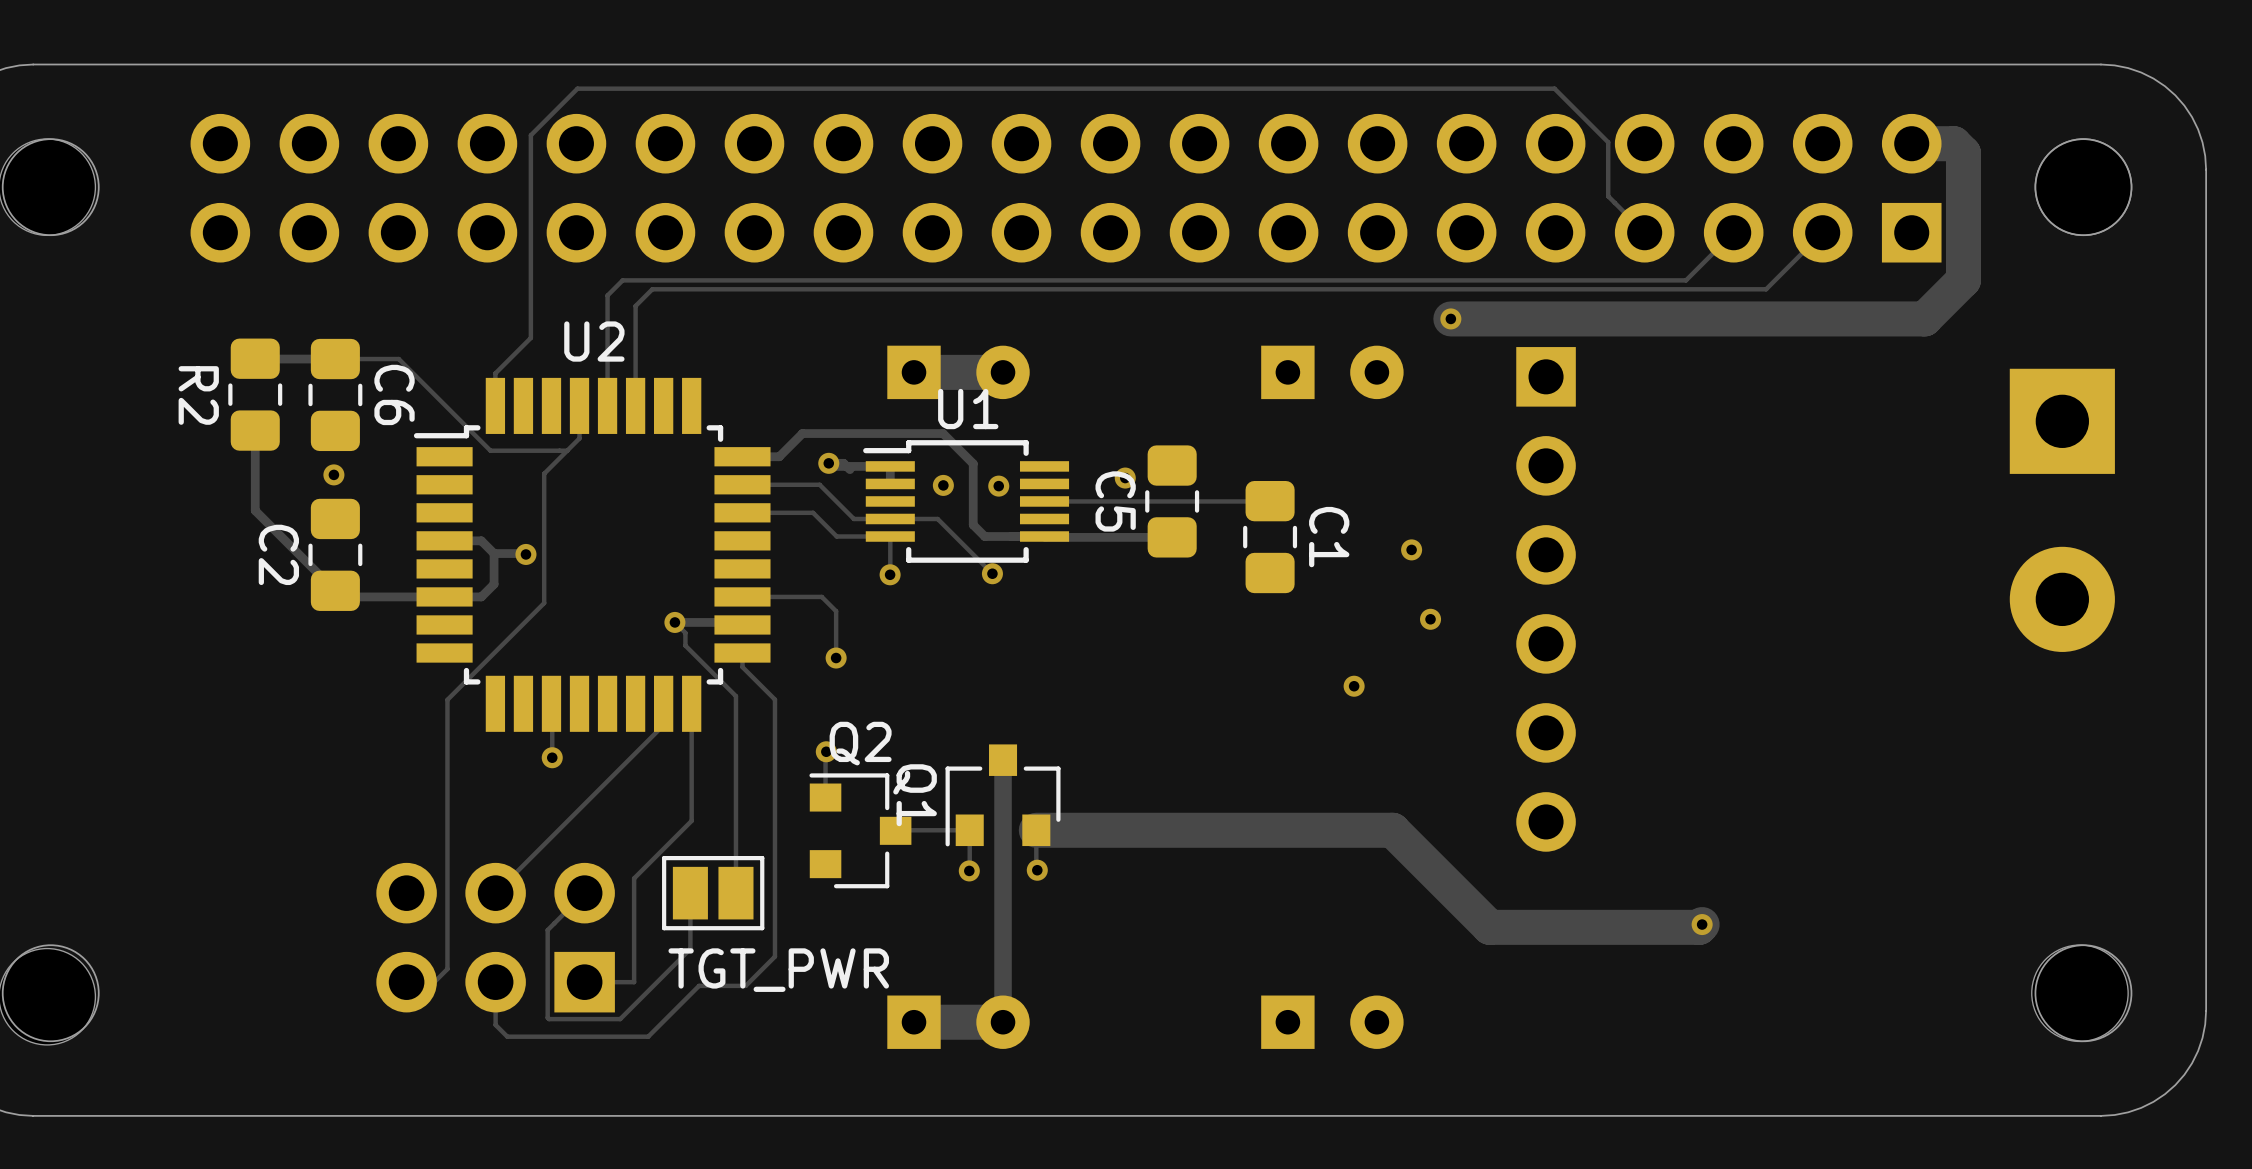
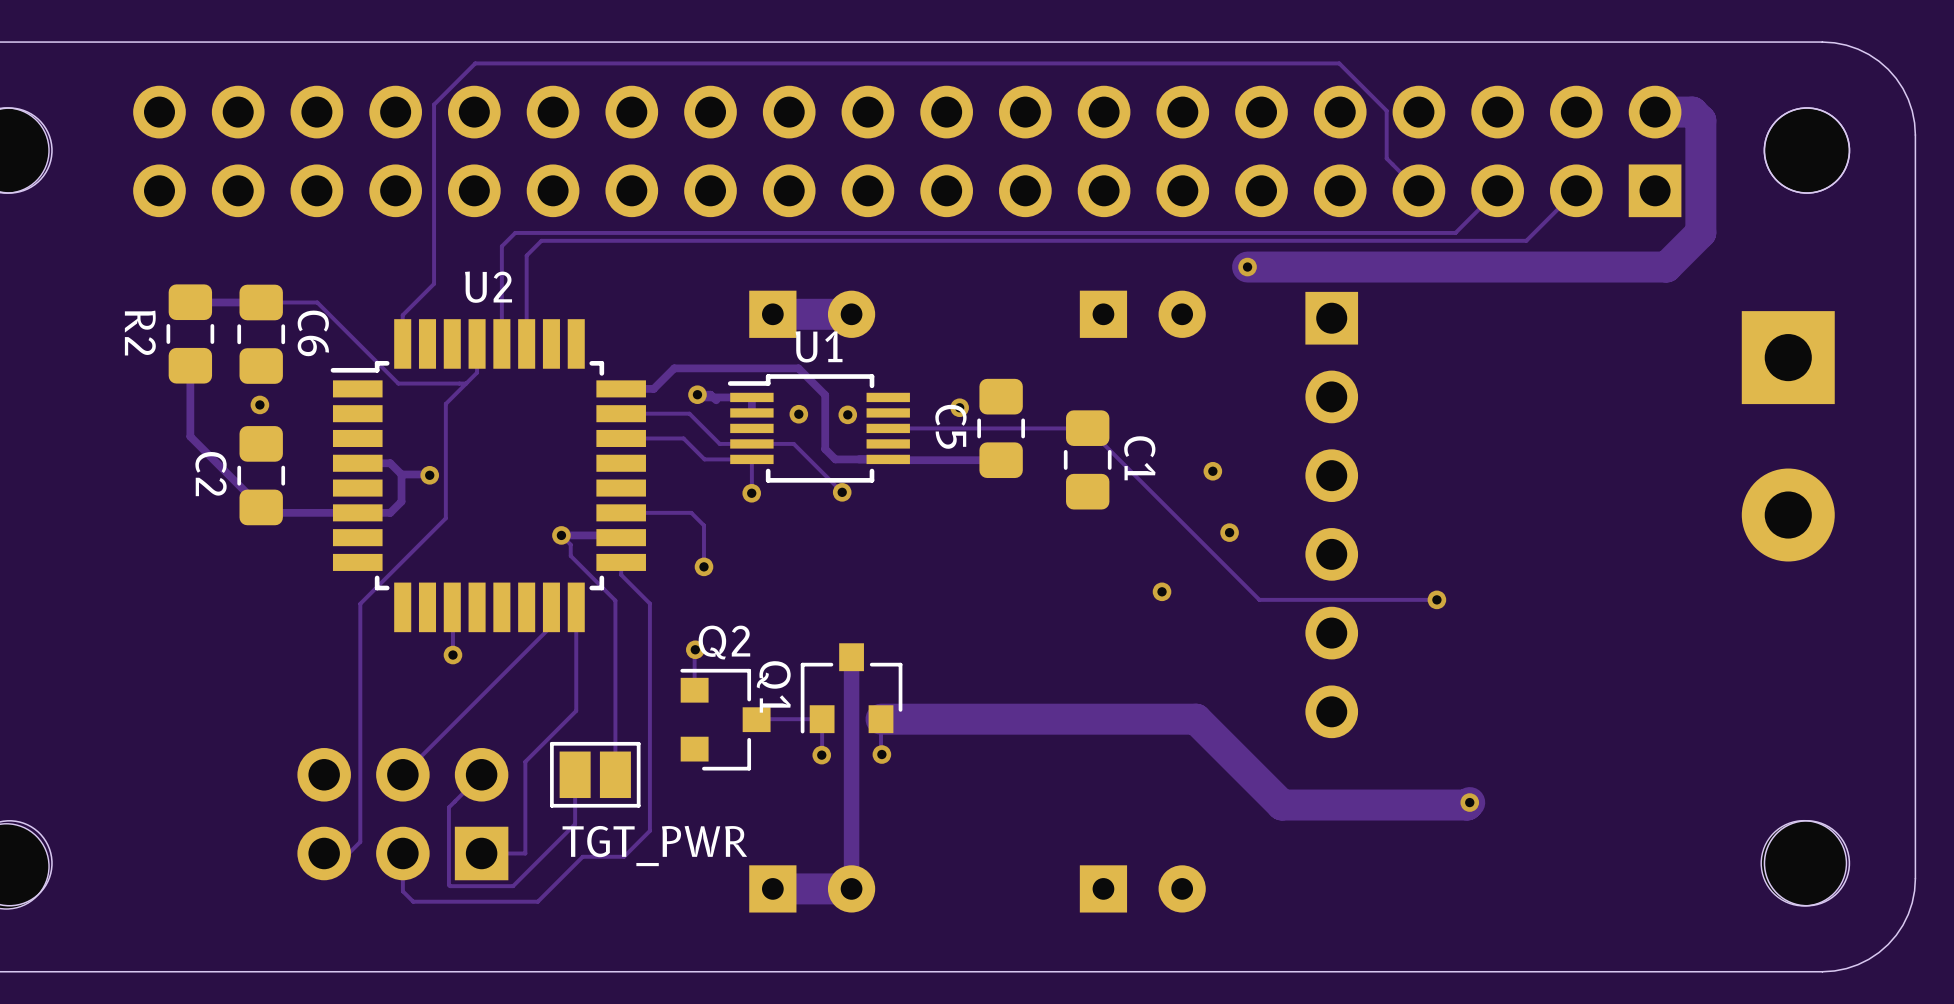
track: none -> (1087, 428) (1259, 599) (1436, 599)
via: none -> (1436, 599)

